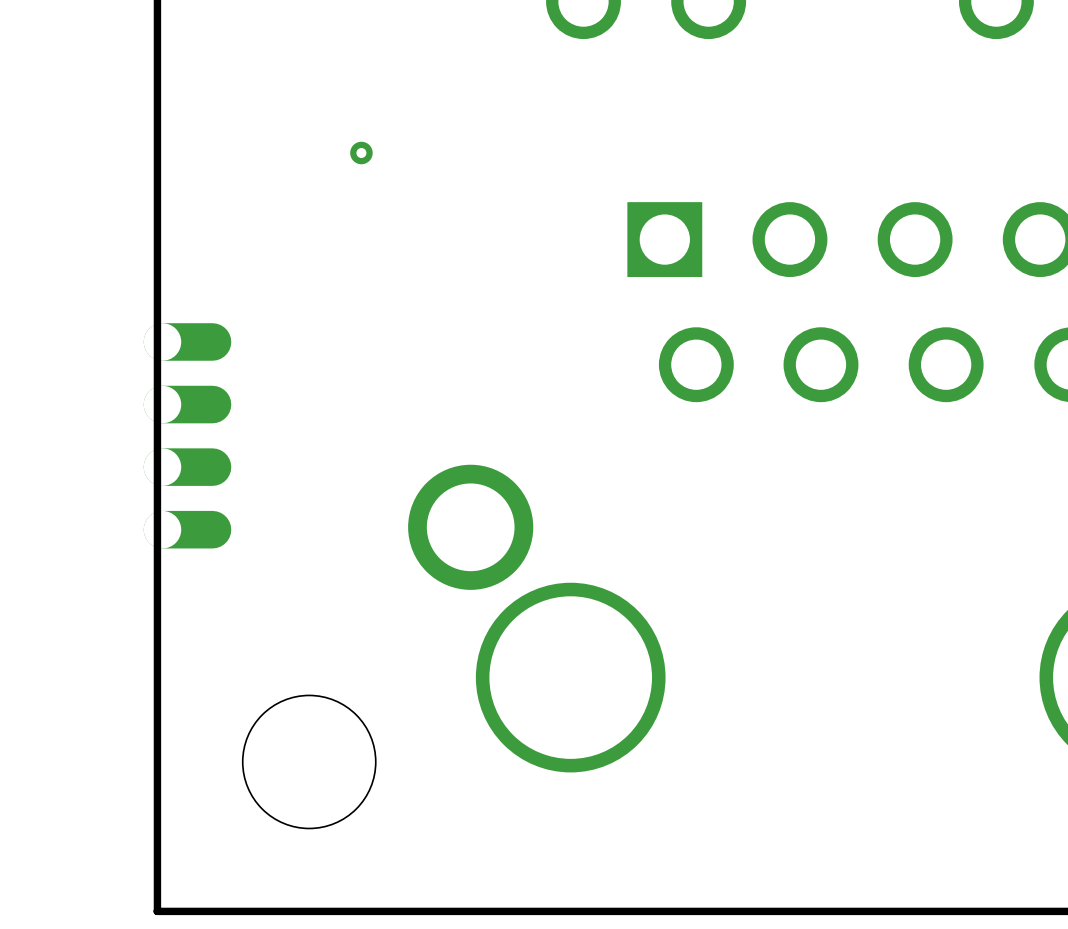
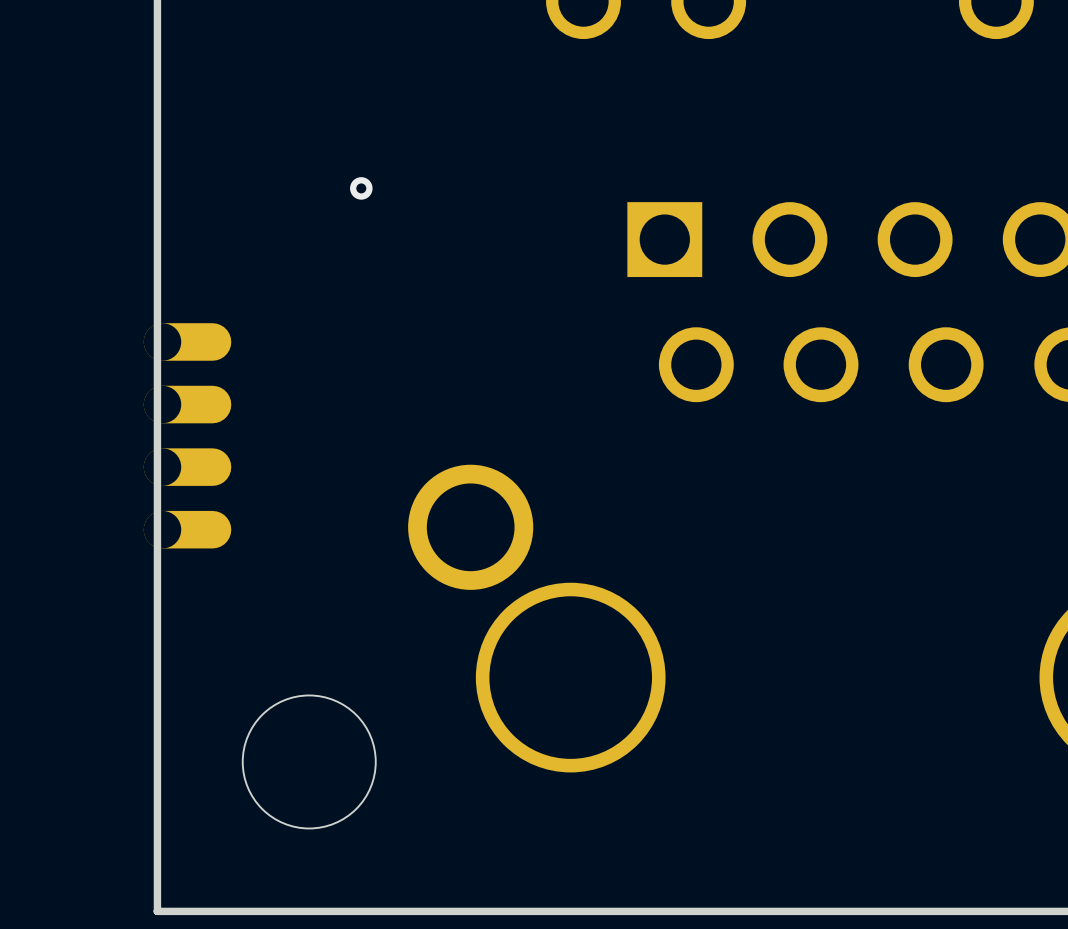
via position: (361, 153) -> (361, 188)

